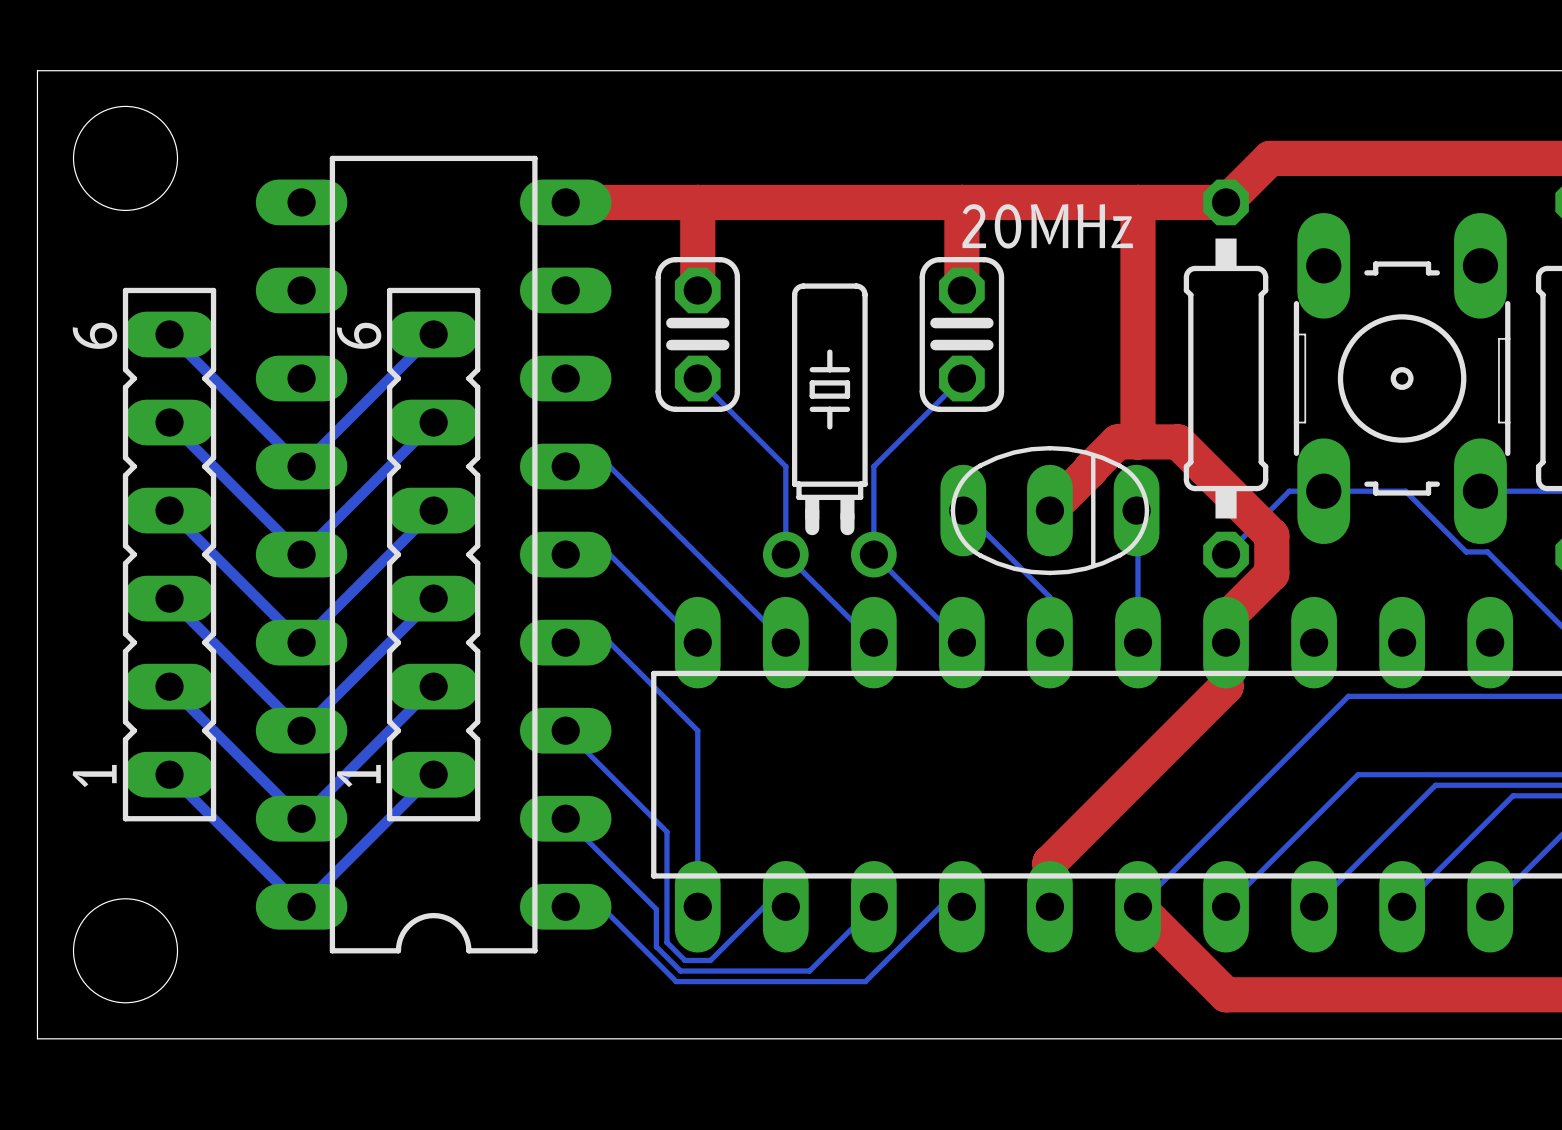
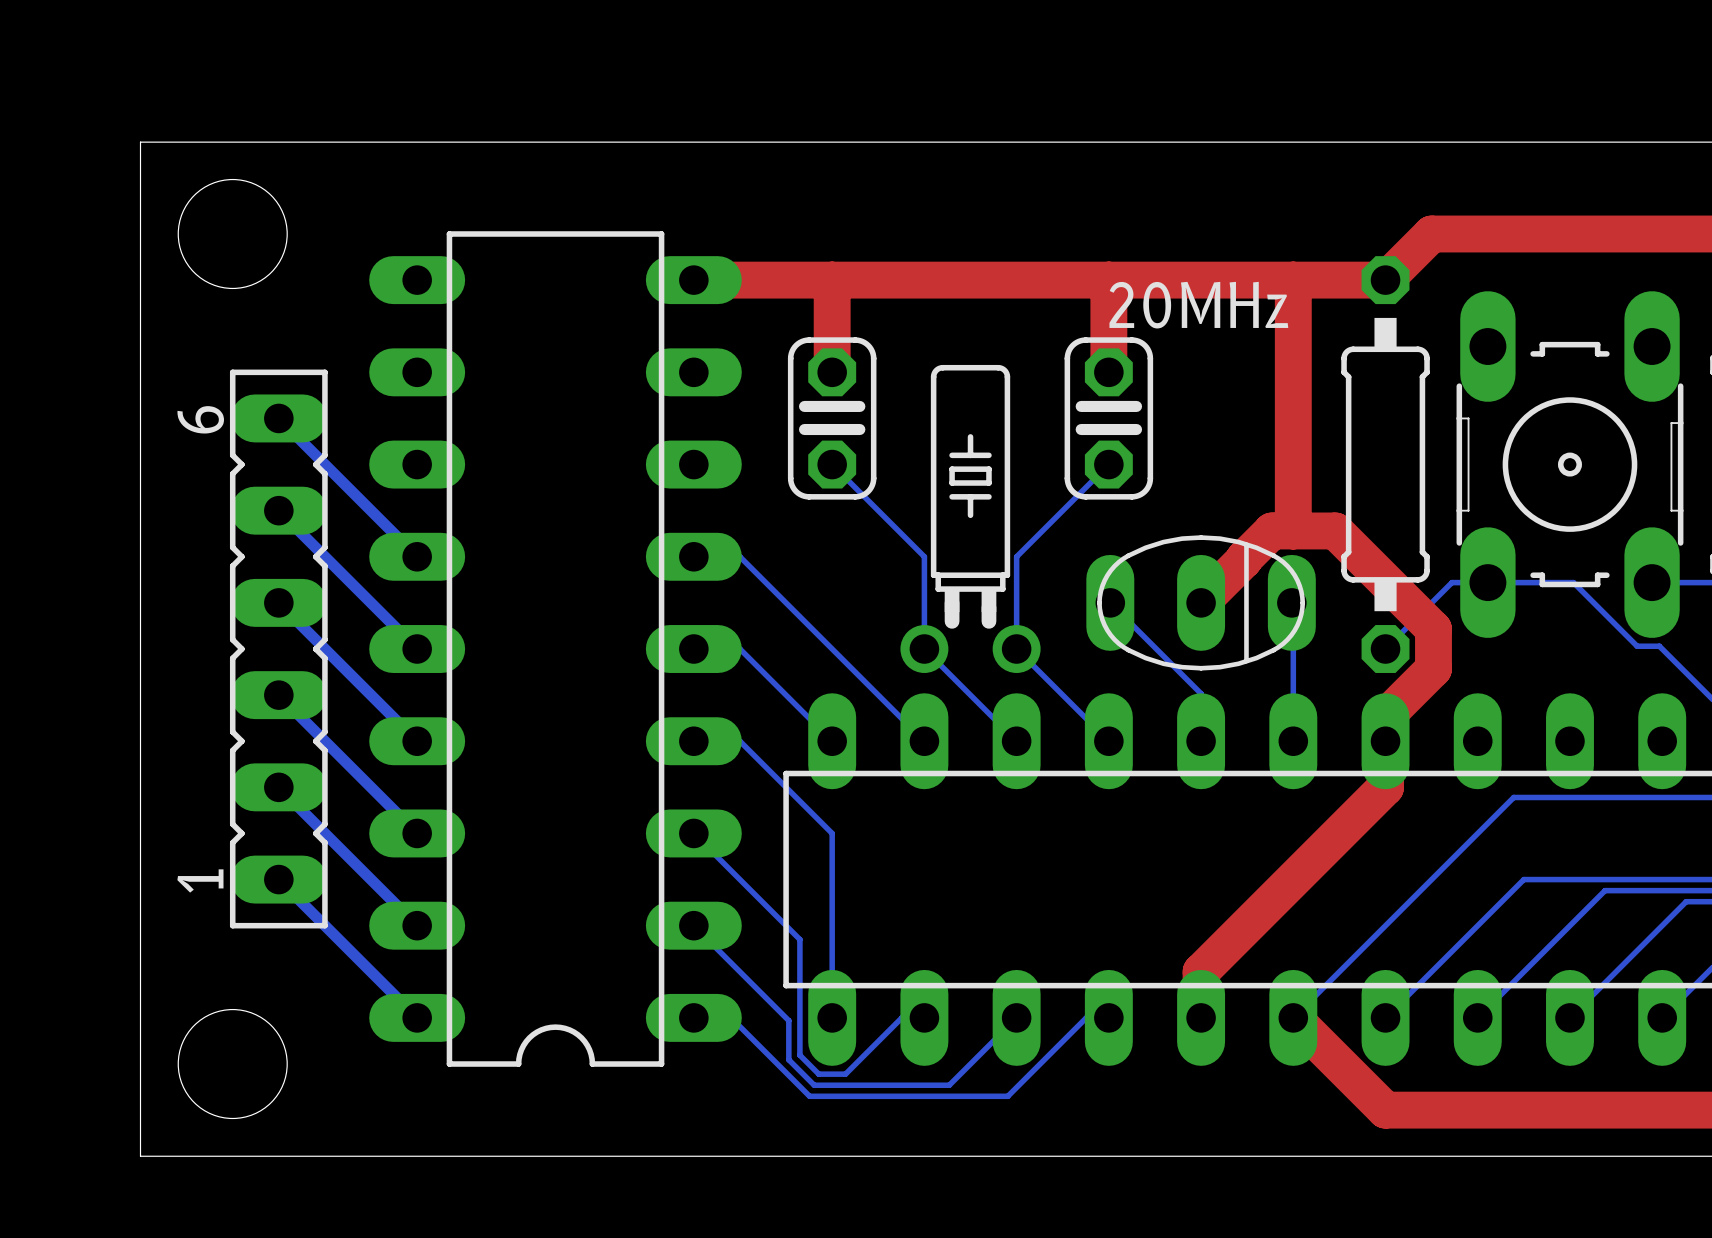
bottom track: (433, 334) (301, 466) -> none
bottom track: (433, 422) (301, 554) -> none
bottom track: (433, 510) (301, 642) -> none
part: (433, 554) -> none
bottom track: (433, 598) (301, 730) -> none
bottom track: (433, 686) (301, 818) -> none
bottom track: (433, 774) (301, 906) -> none

